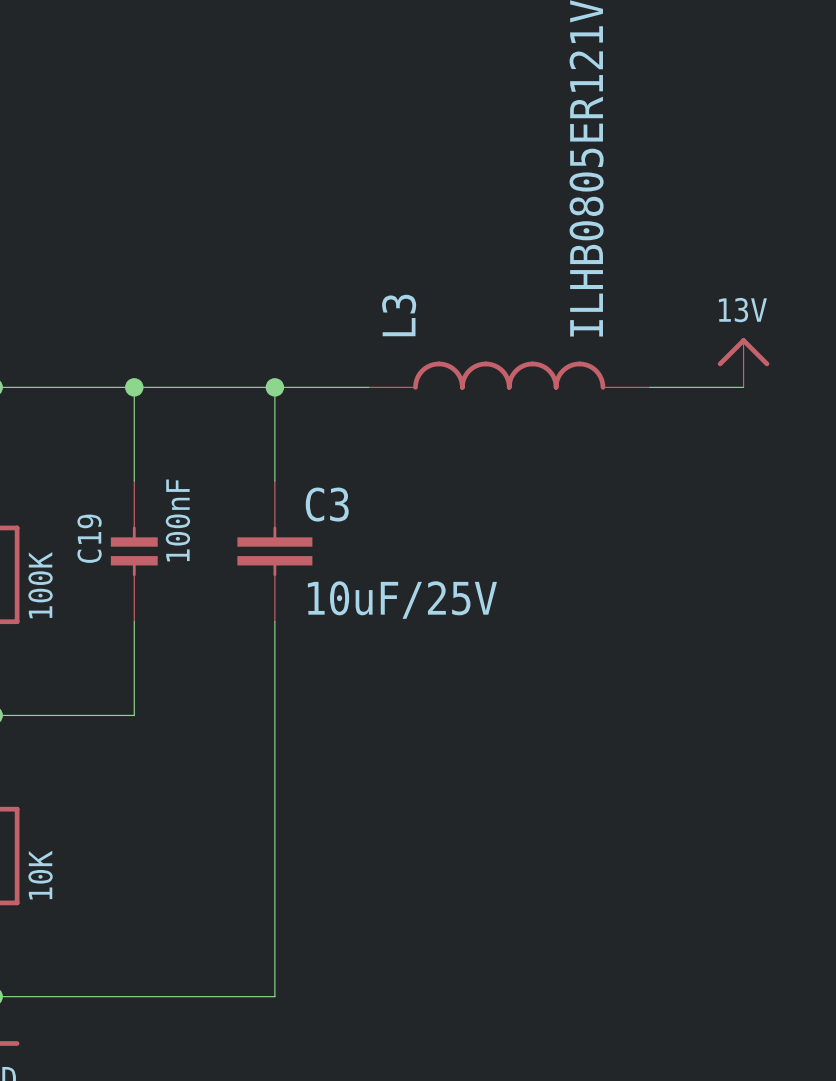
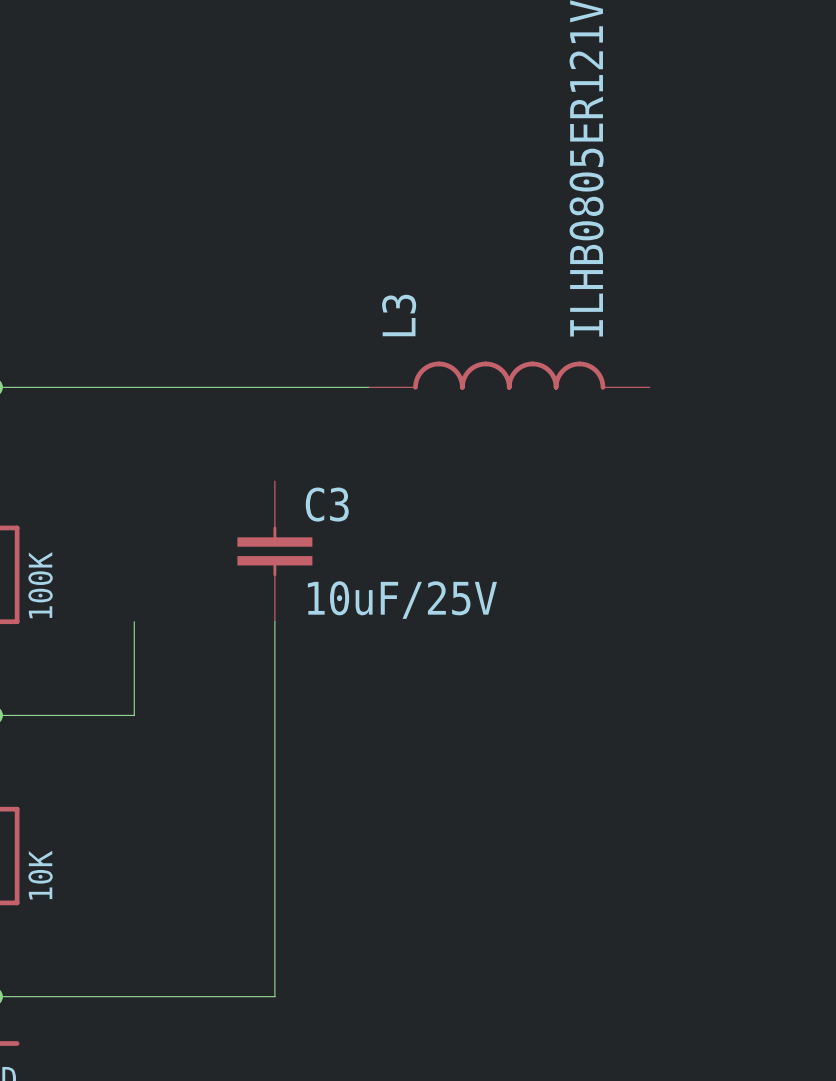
power symbol: 13V (743, 362) -> none
wire: (134, 387) (134, 481) -> none
junction: (134, 387) -> none
wire: (274, 387) (274, 481) -> none
junction: (274, 387) -> none
wire: (649, 387) (743, 387) -> none
C19: 100nF (134, 551) -> none

